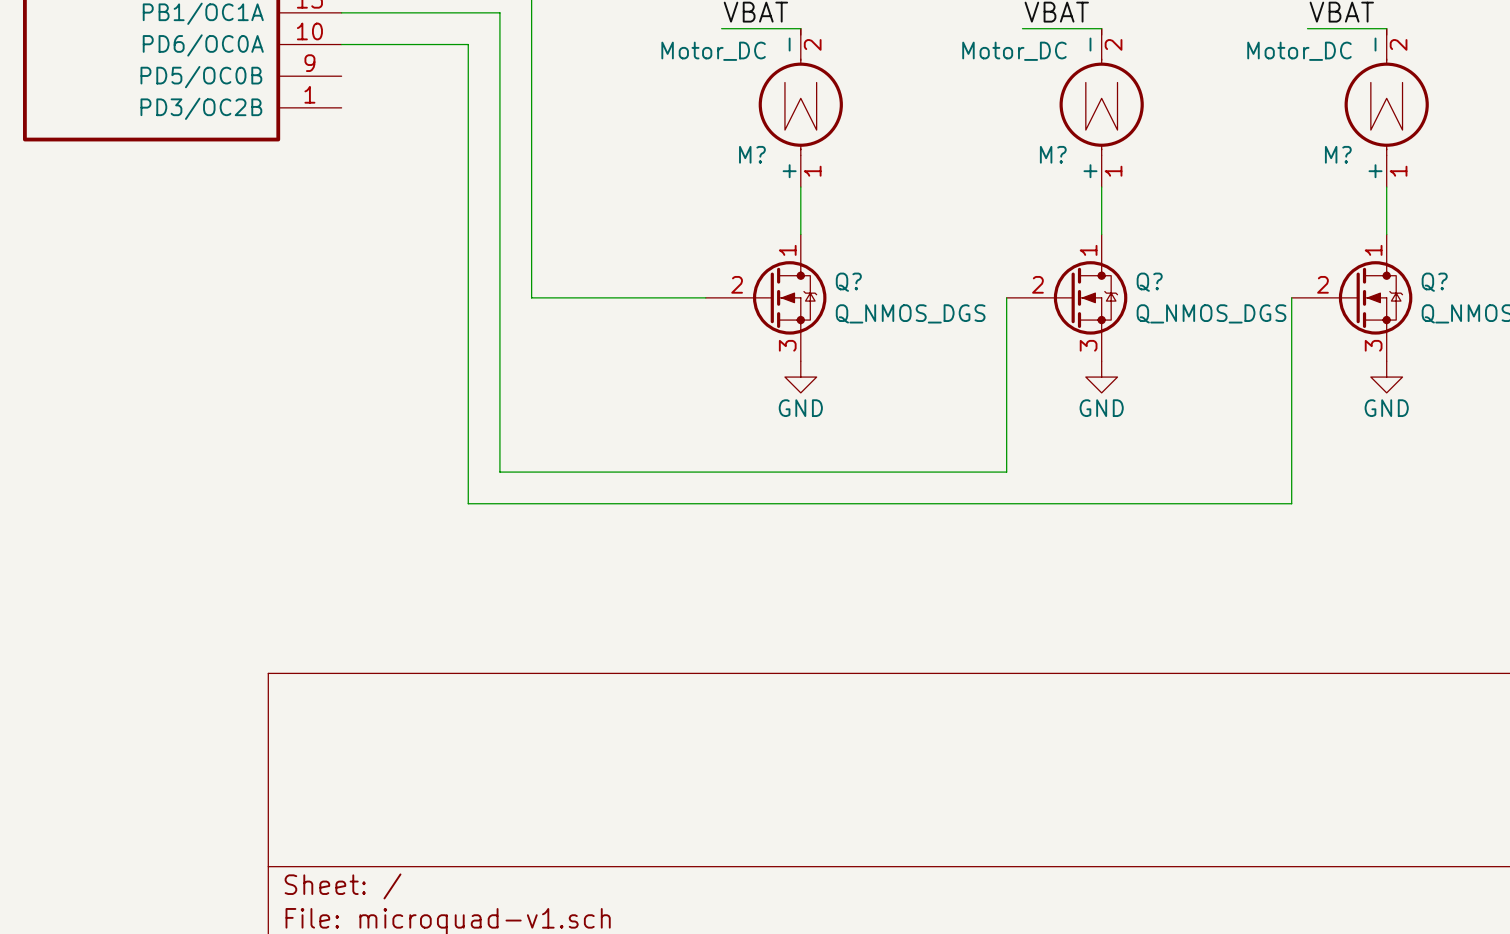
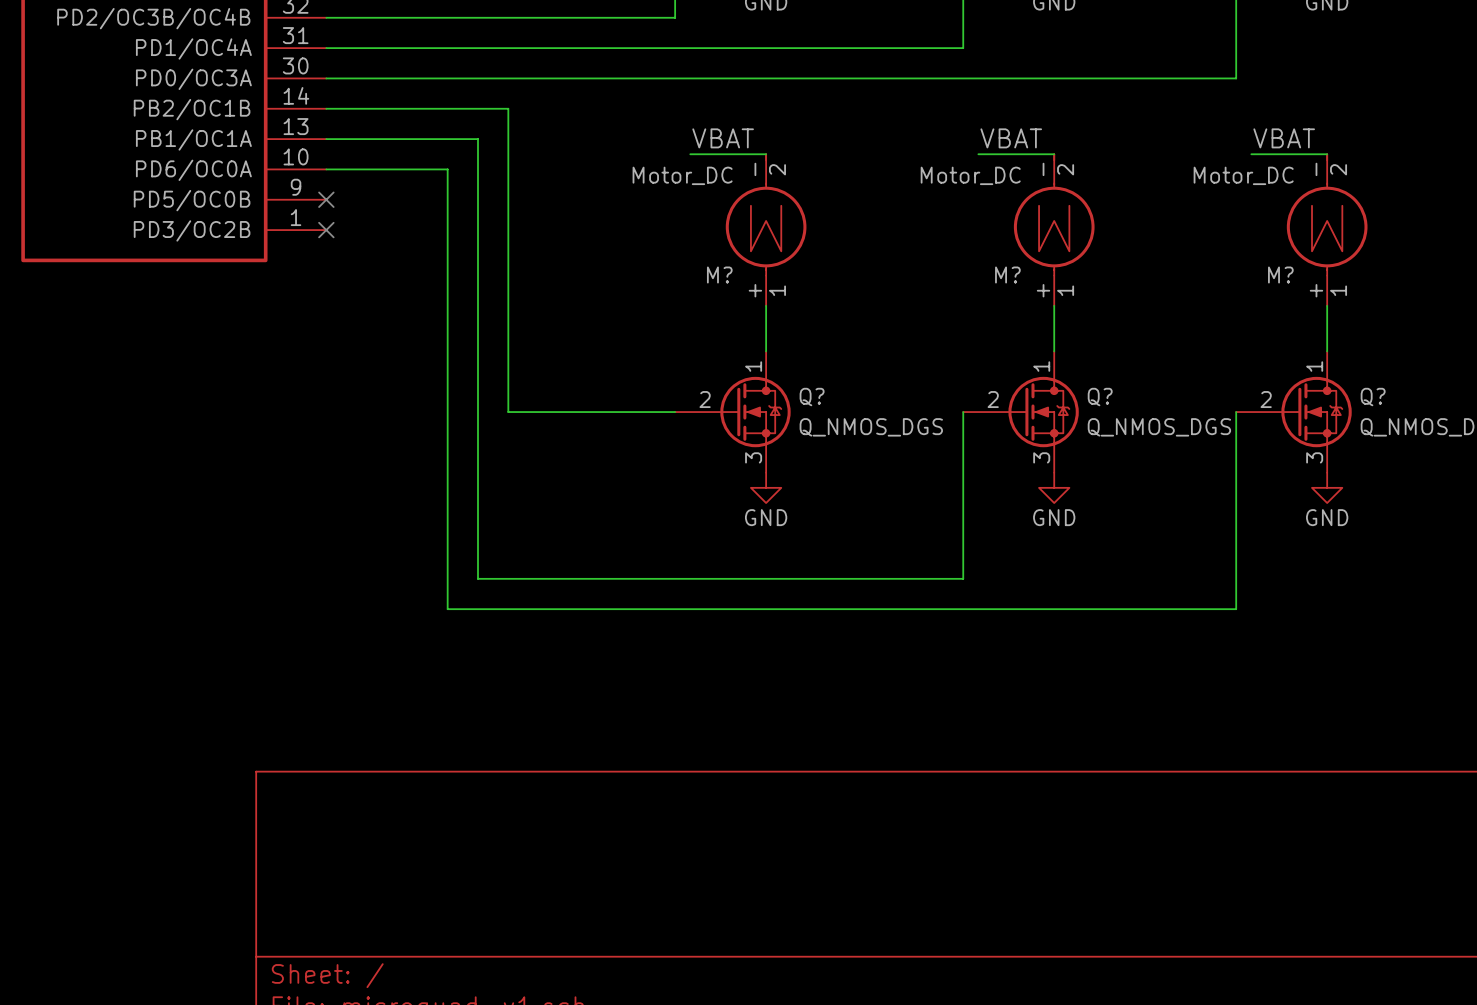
no-connect mark: none -> (326, 199)
no-connect mark: none -> (326, 230)

